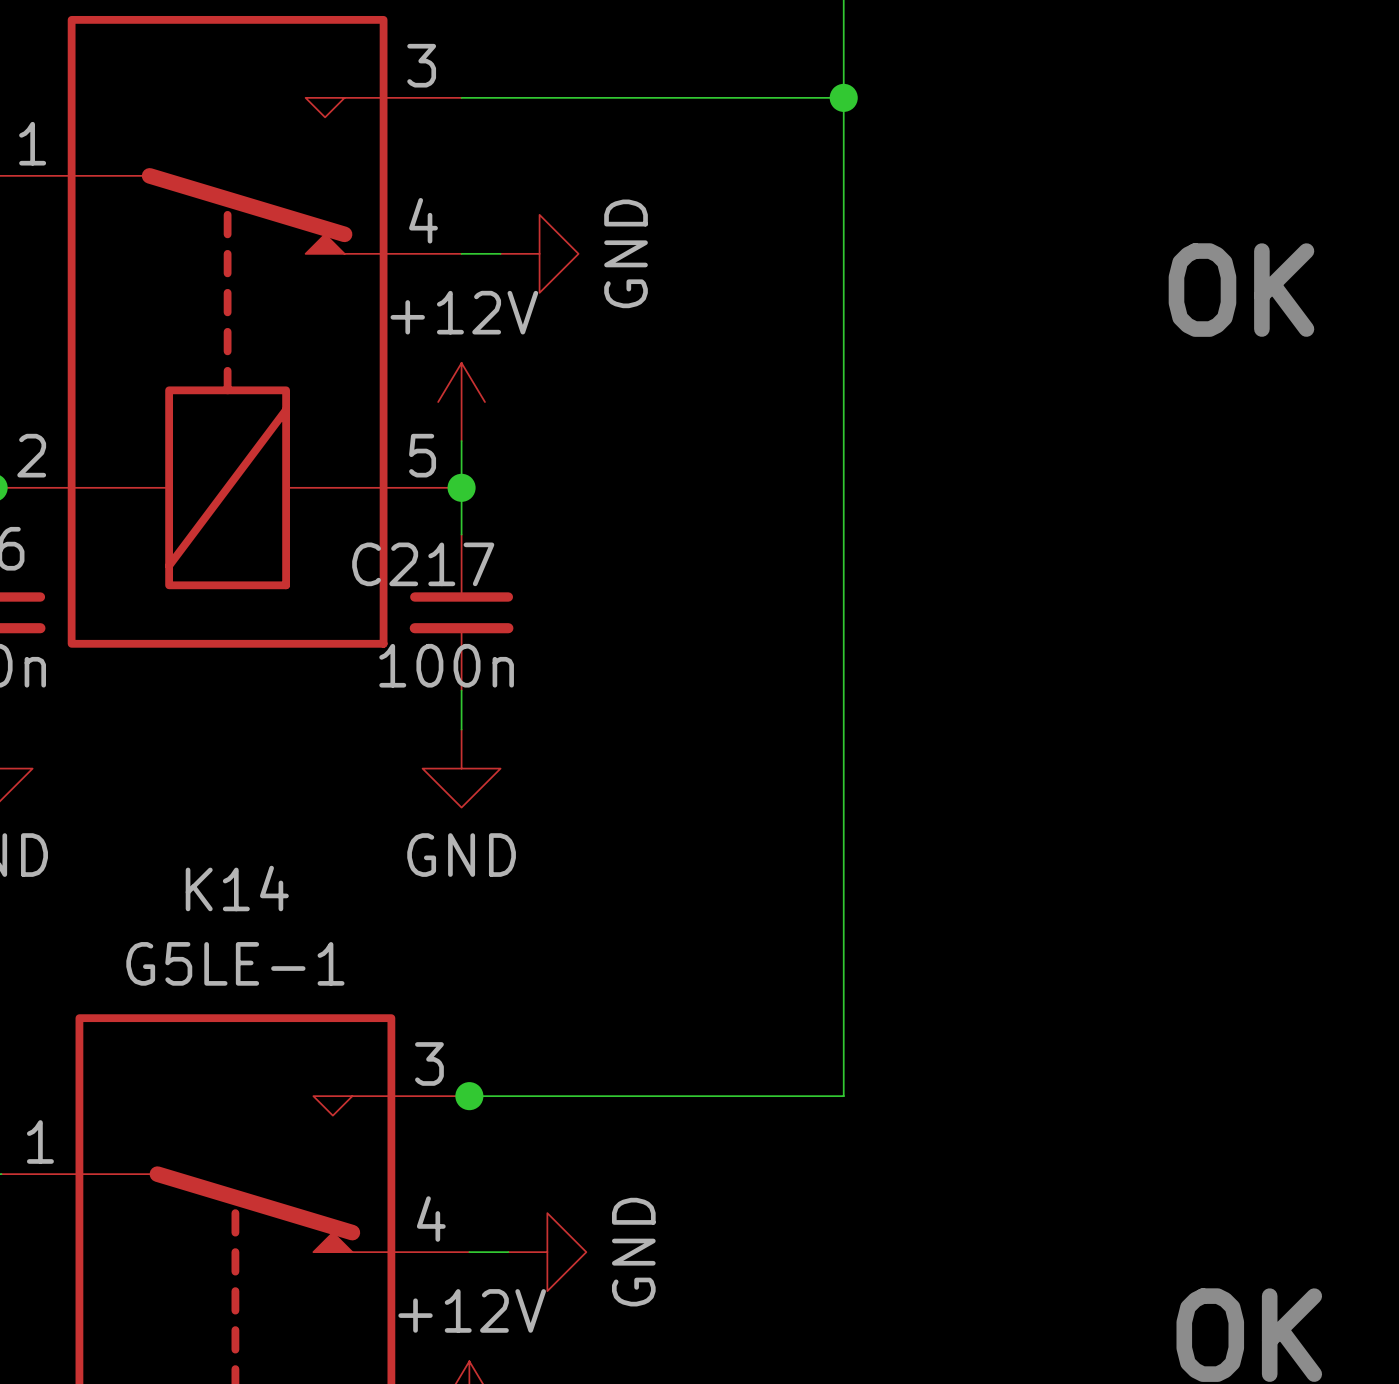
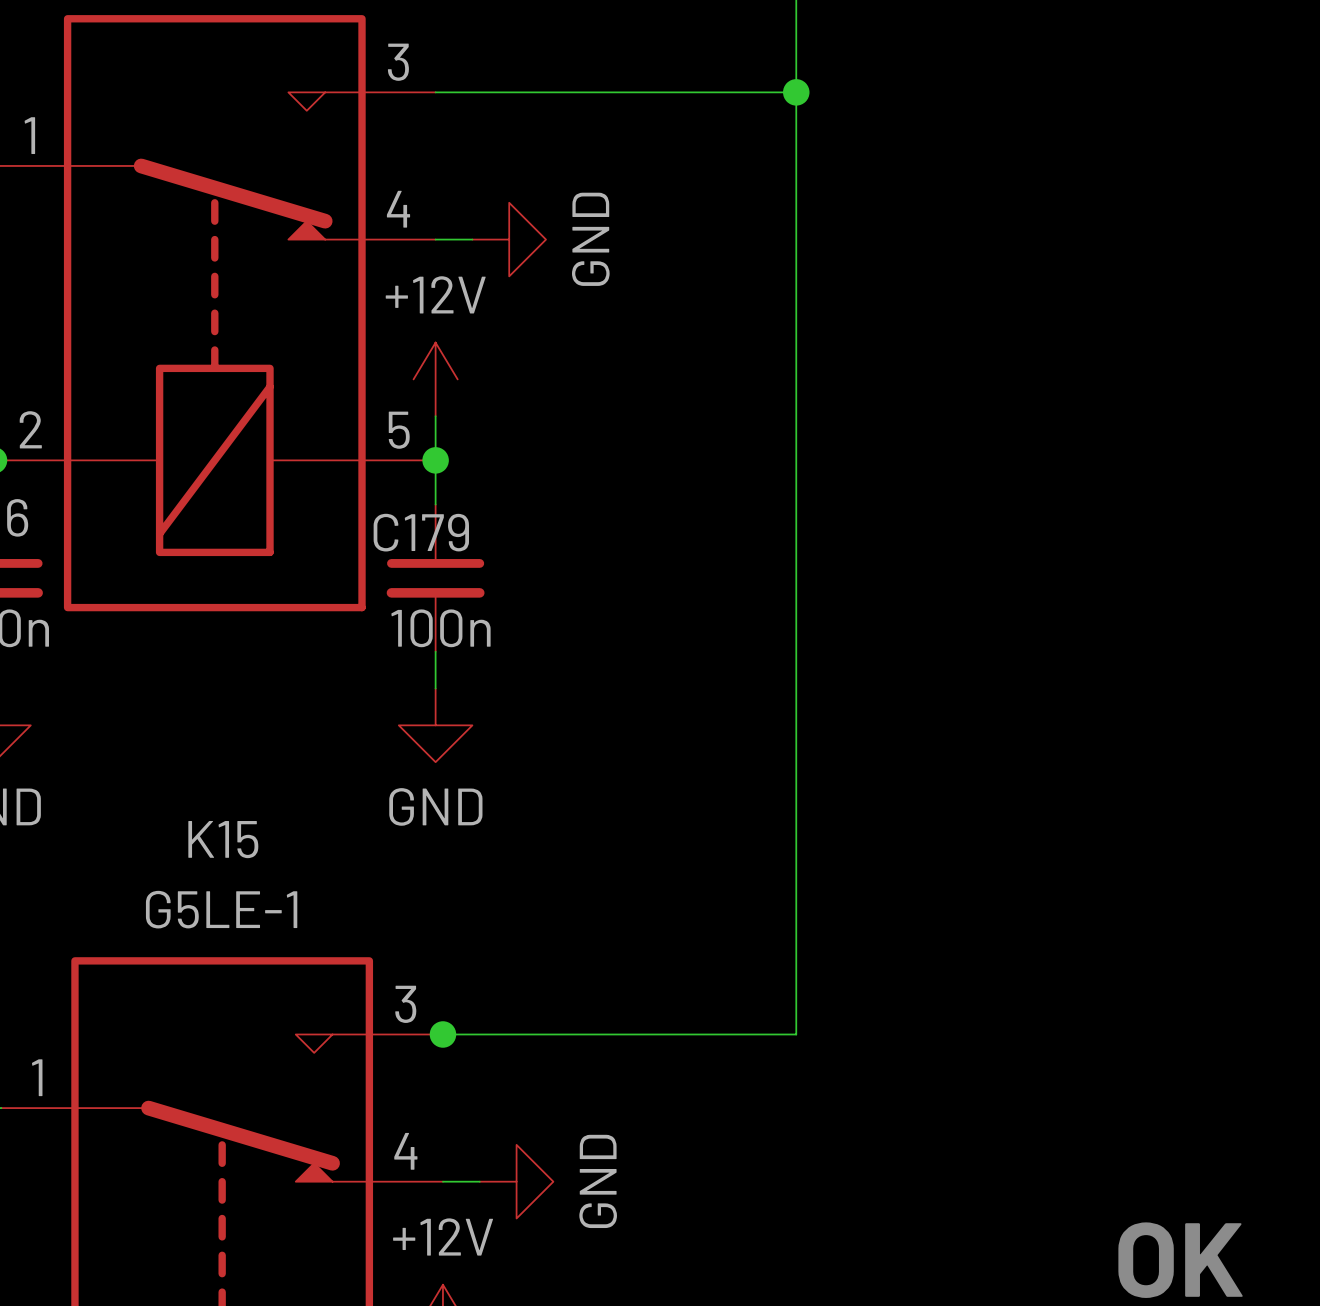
text: OK (1241, 290) -> none
C217 name: C217 (423, 564) -> C179 (421, 532)
K14 name: K14 (237, 888) -> K15 (223, 839)

